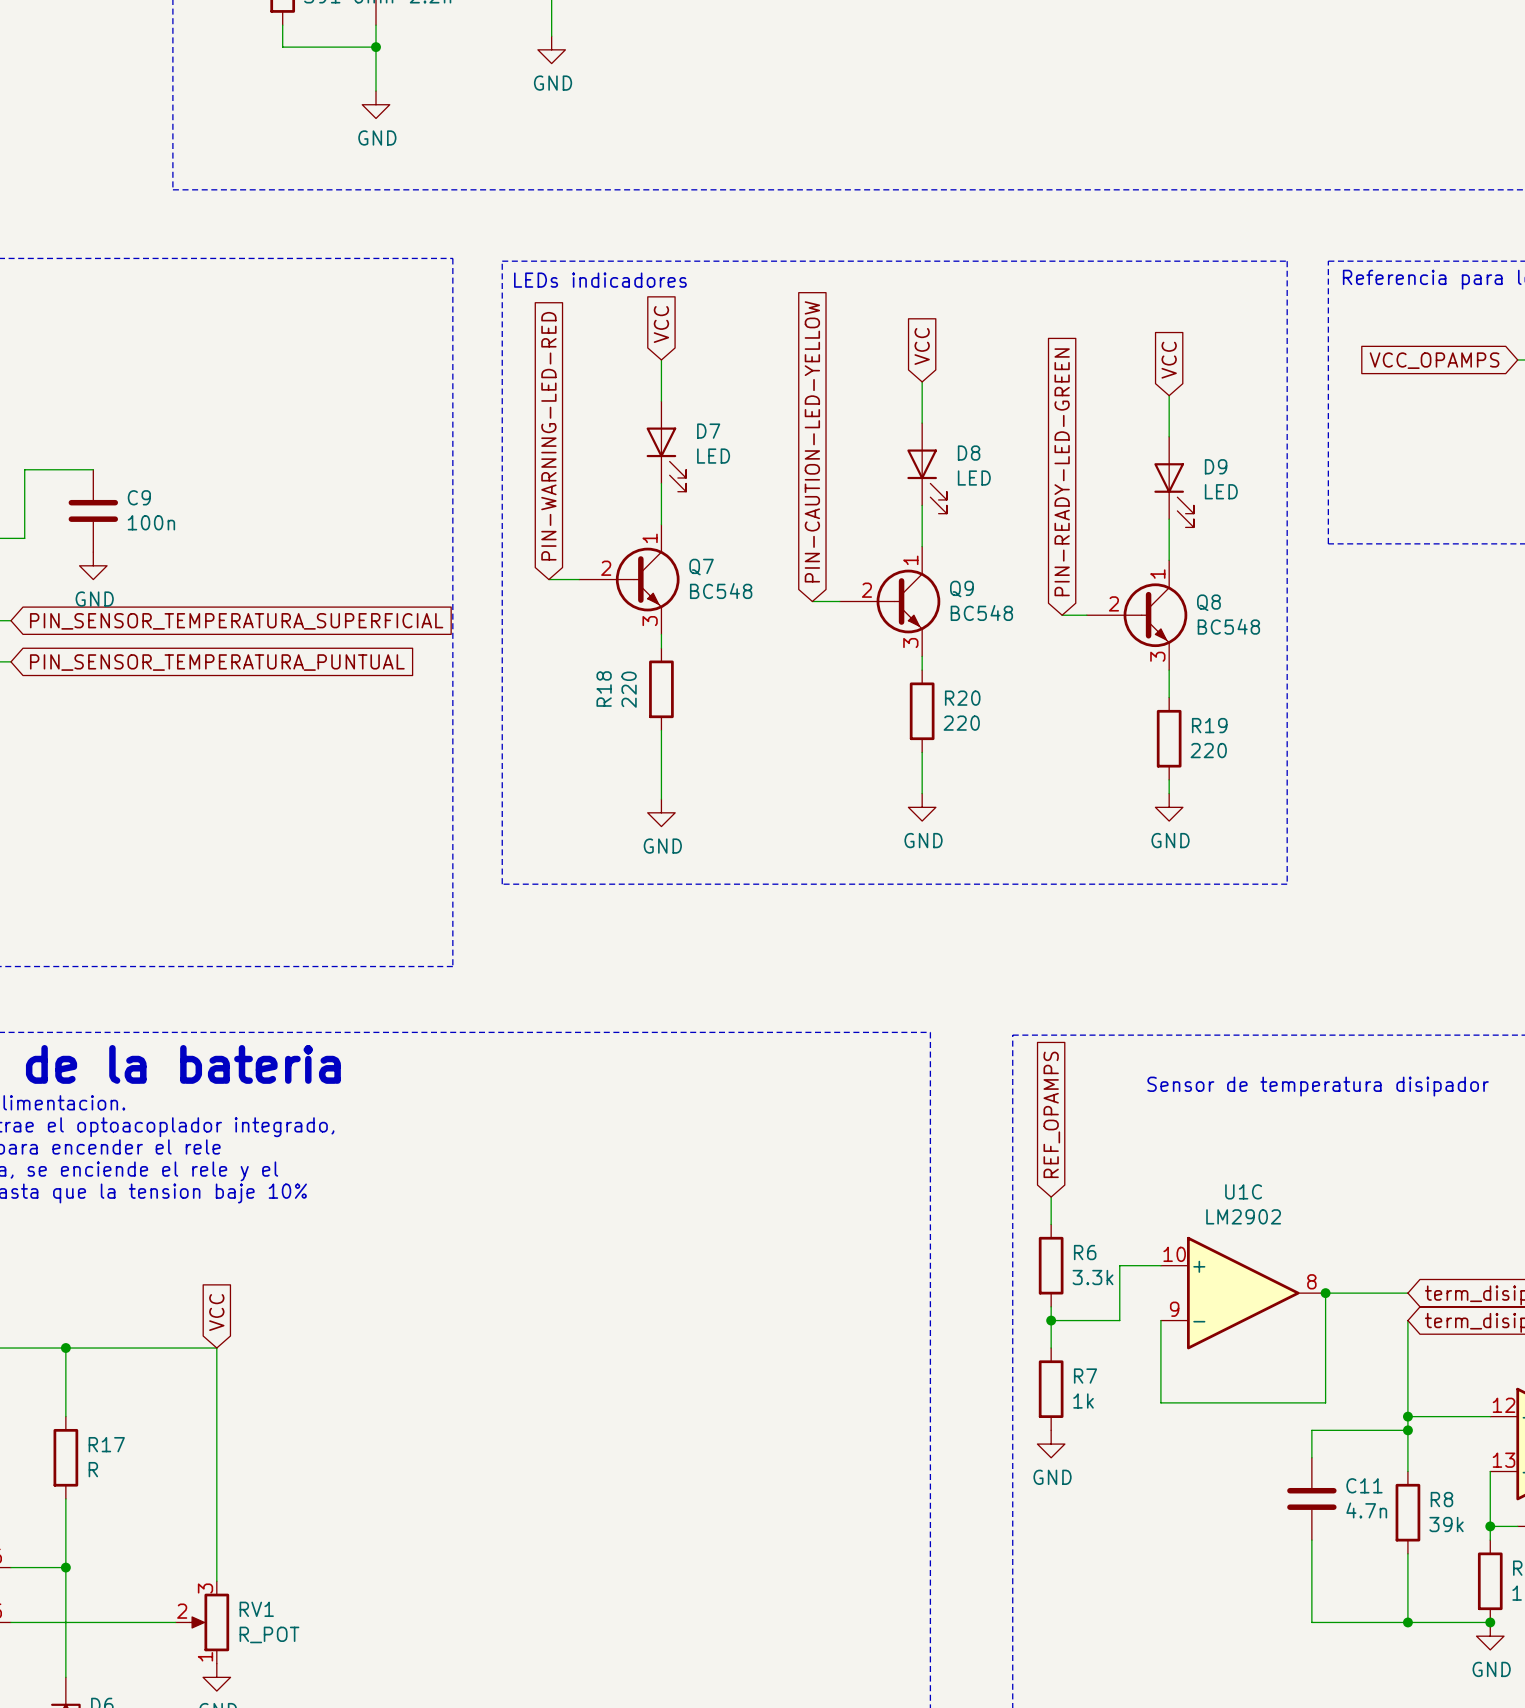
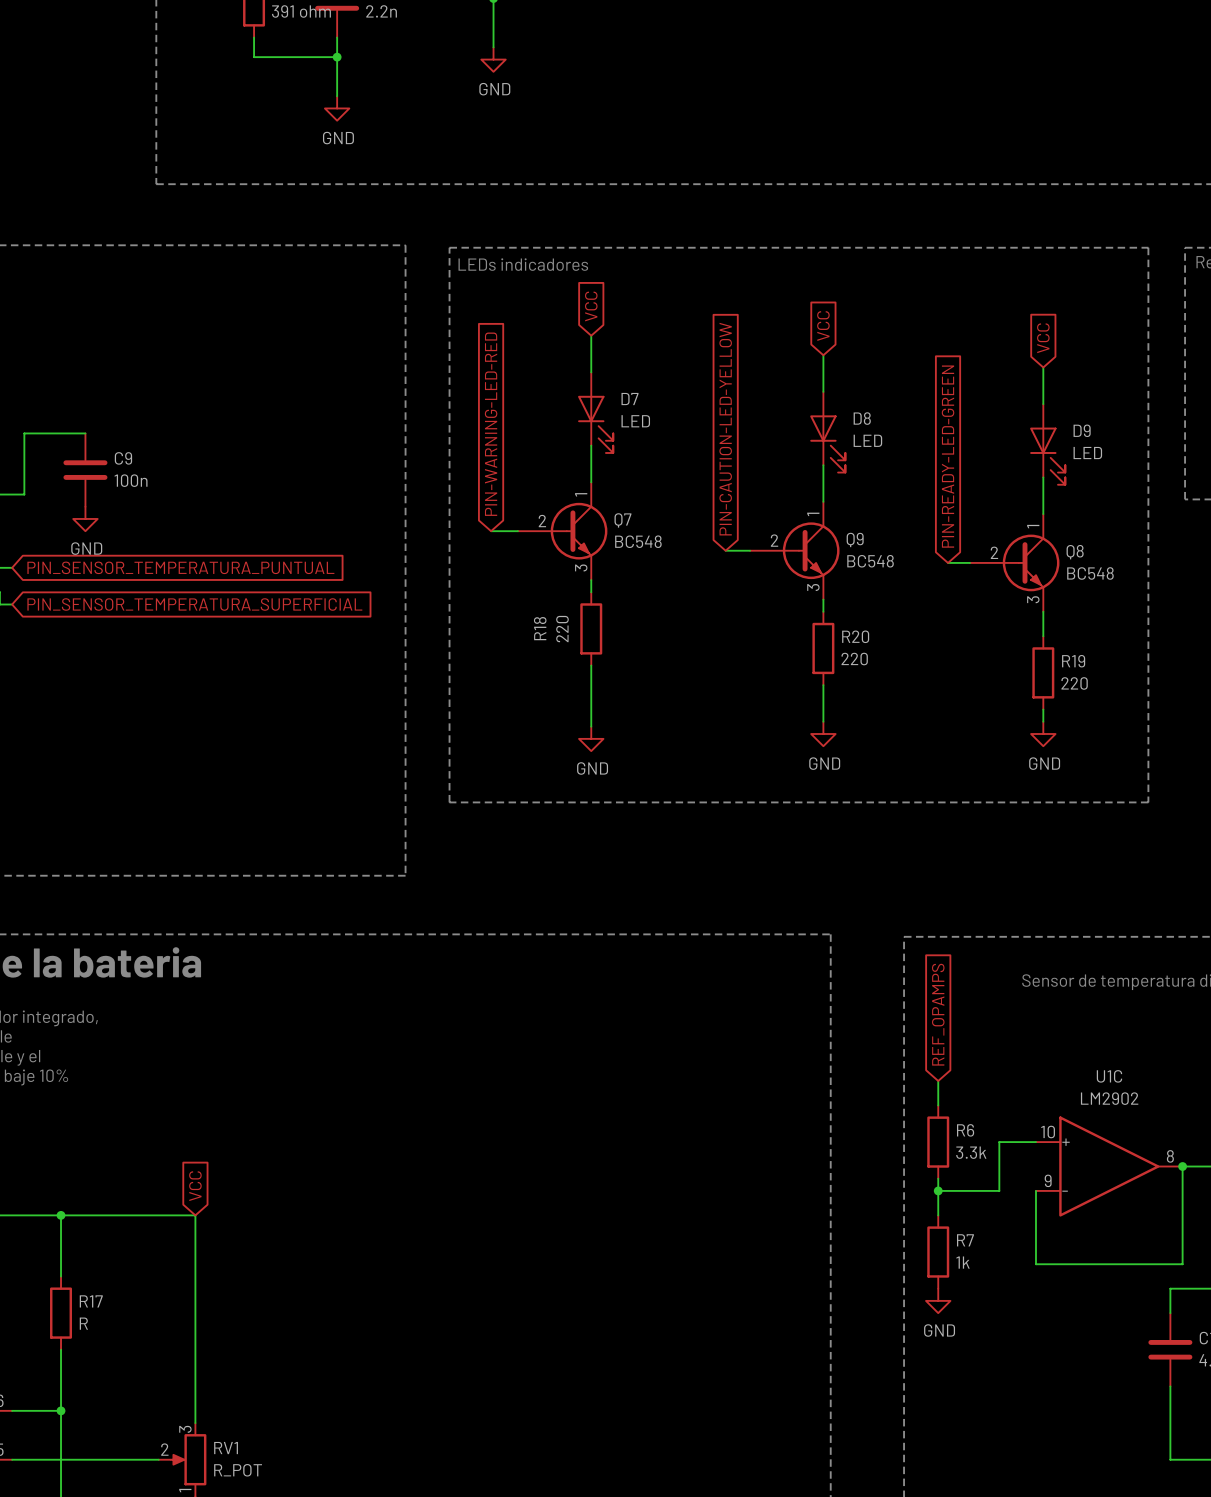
global label: PIN_SENSOR_TEMPERATURA_SUPERFICIAL (236, 621) -> PIN_SENSOR_TEMPERATURA_PUNTUAL (180, 567)
global label: PIN_SENSOR_TEMPERATURA_PUNTUAL (217, 662) -> PIN_SENSOR_TEMPERATURA_SUPERFICIAL (194, 604)

